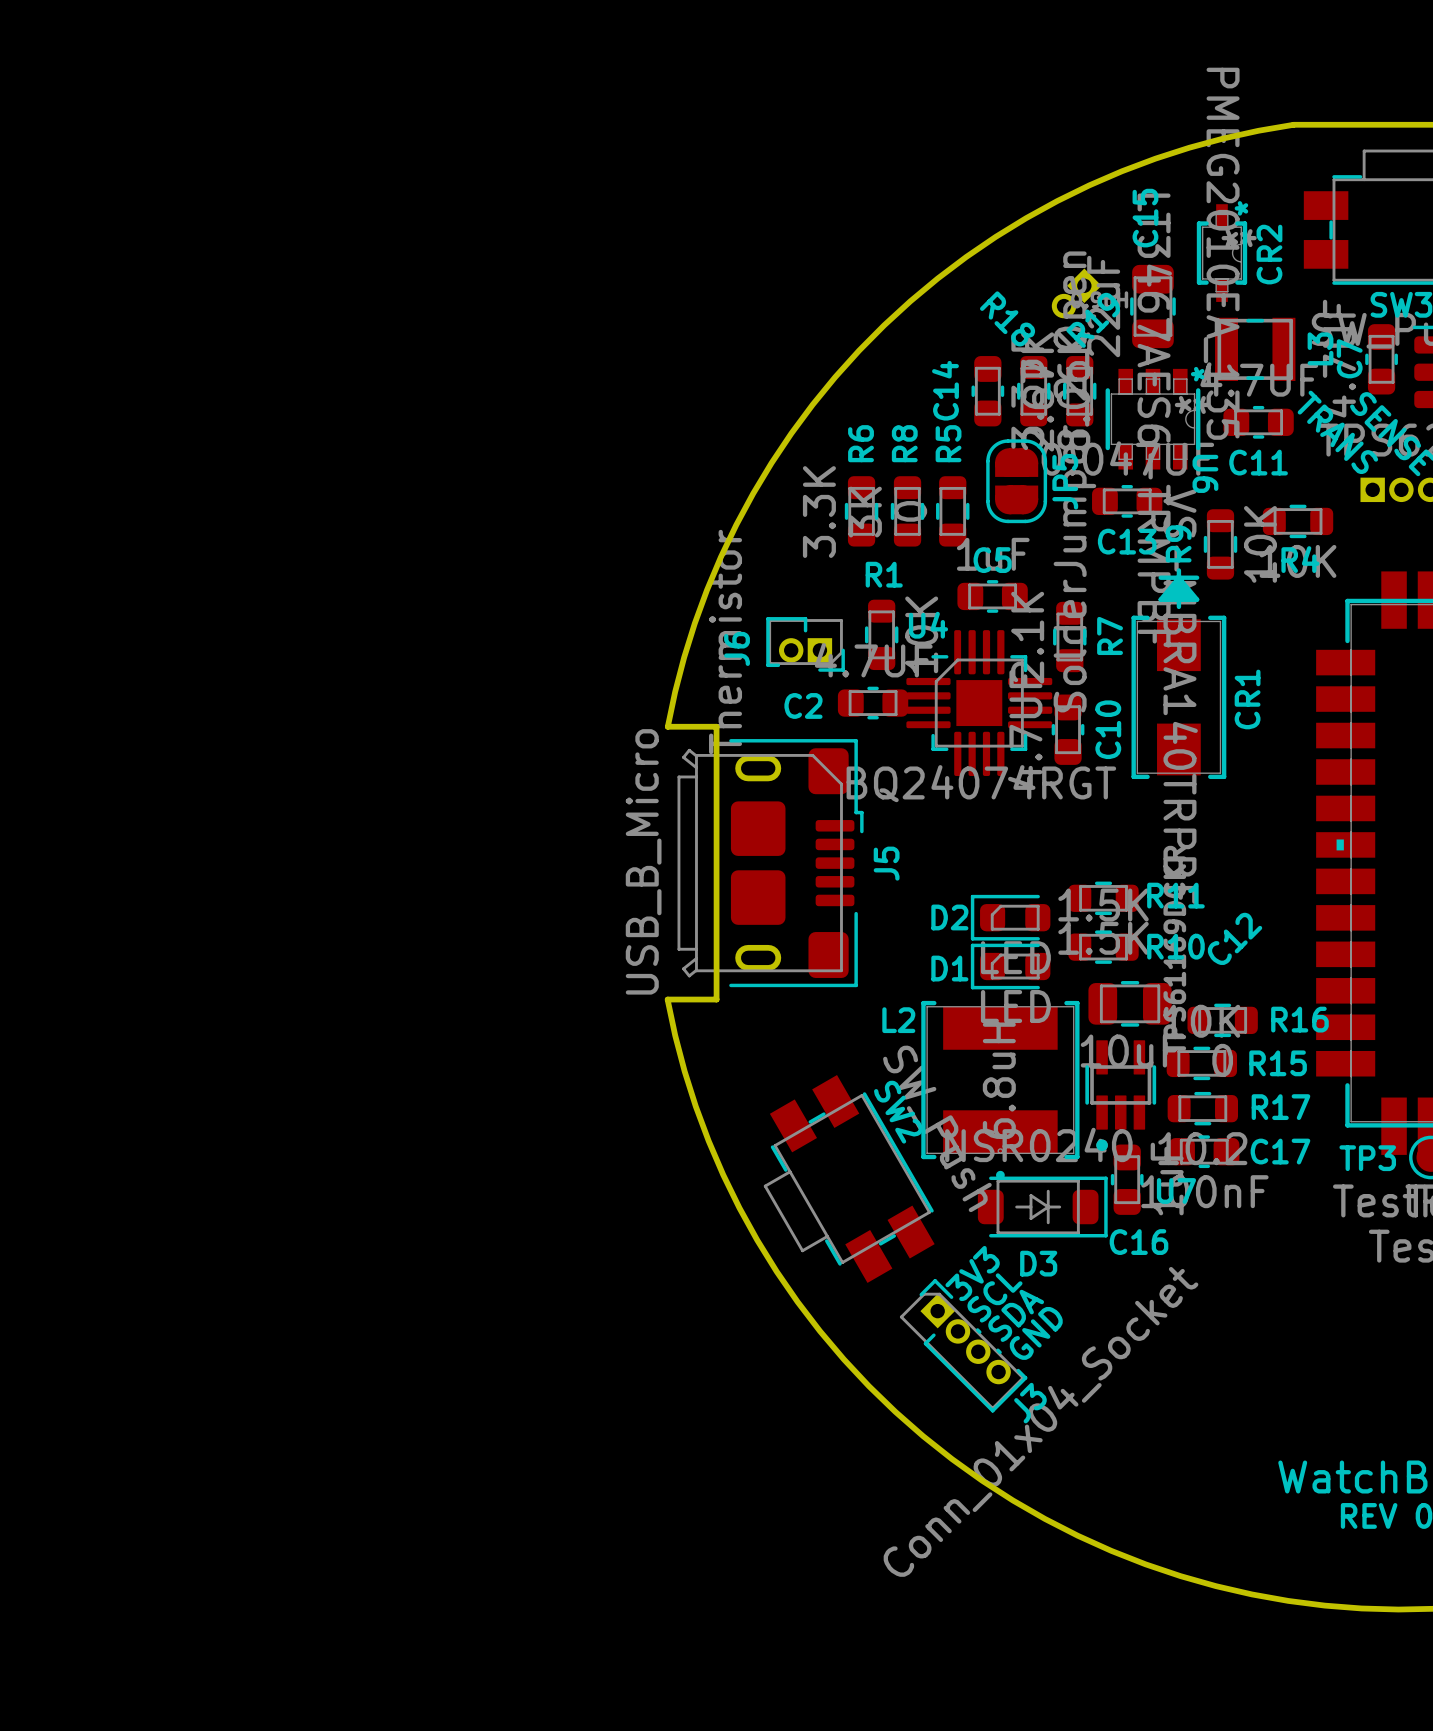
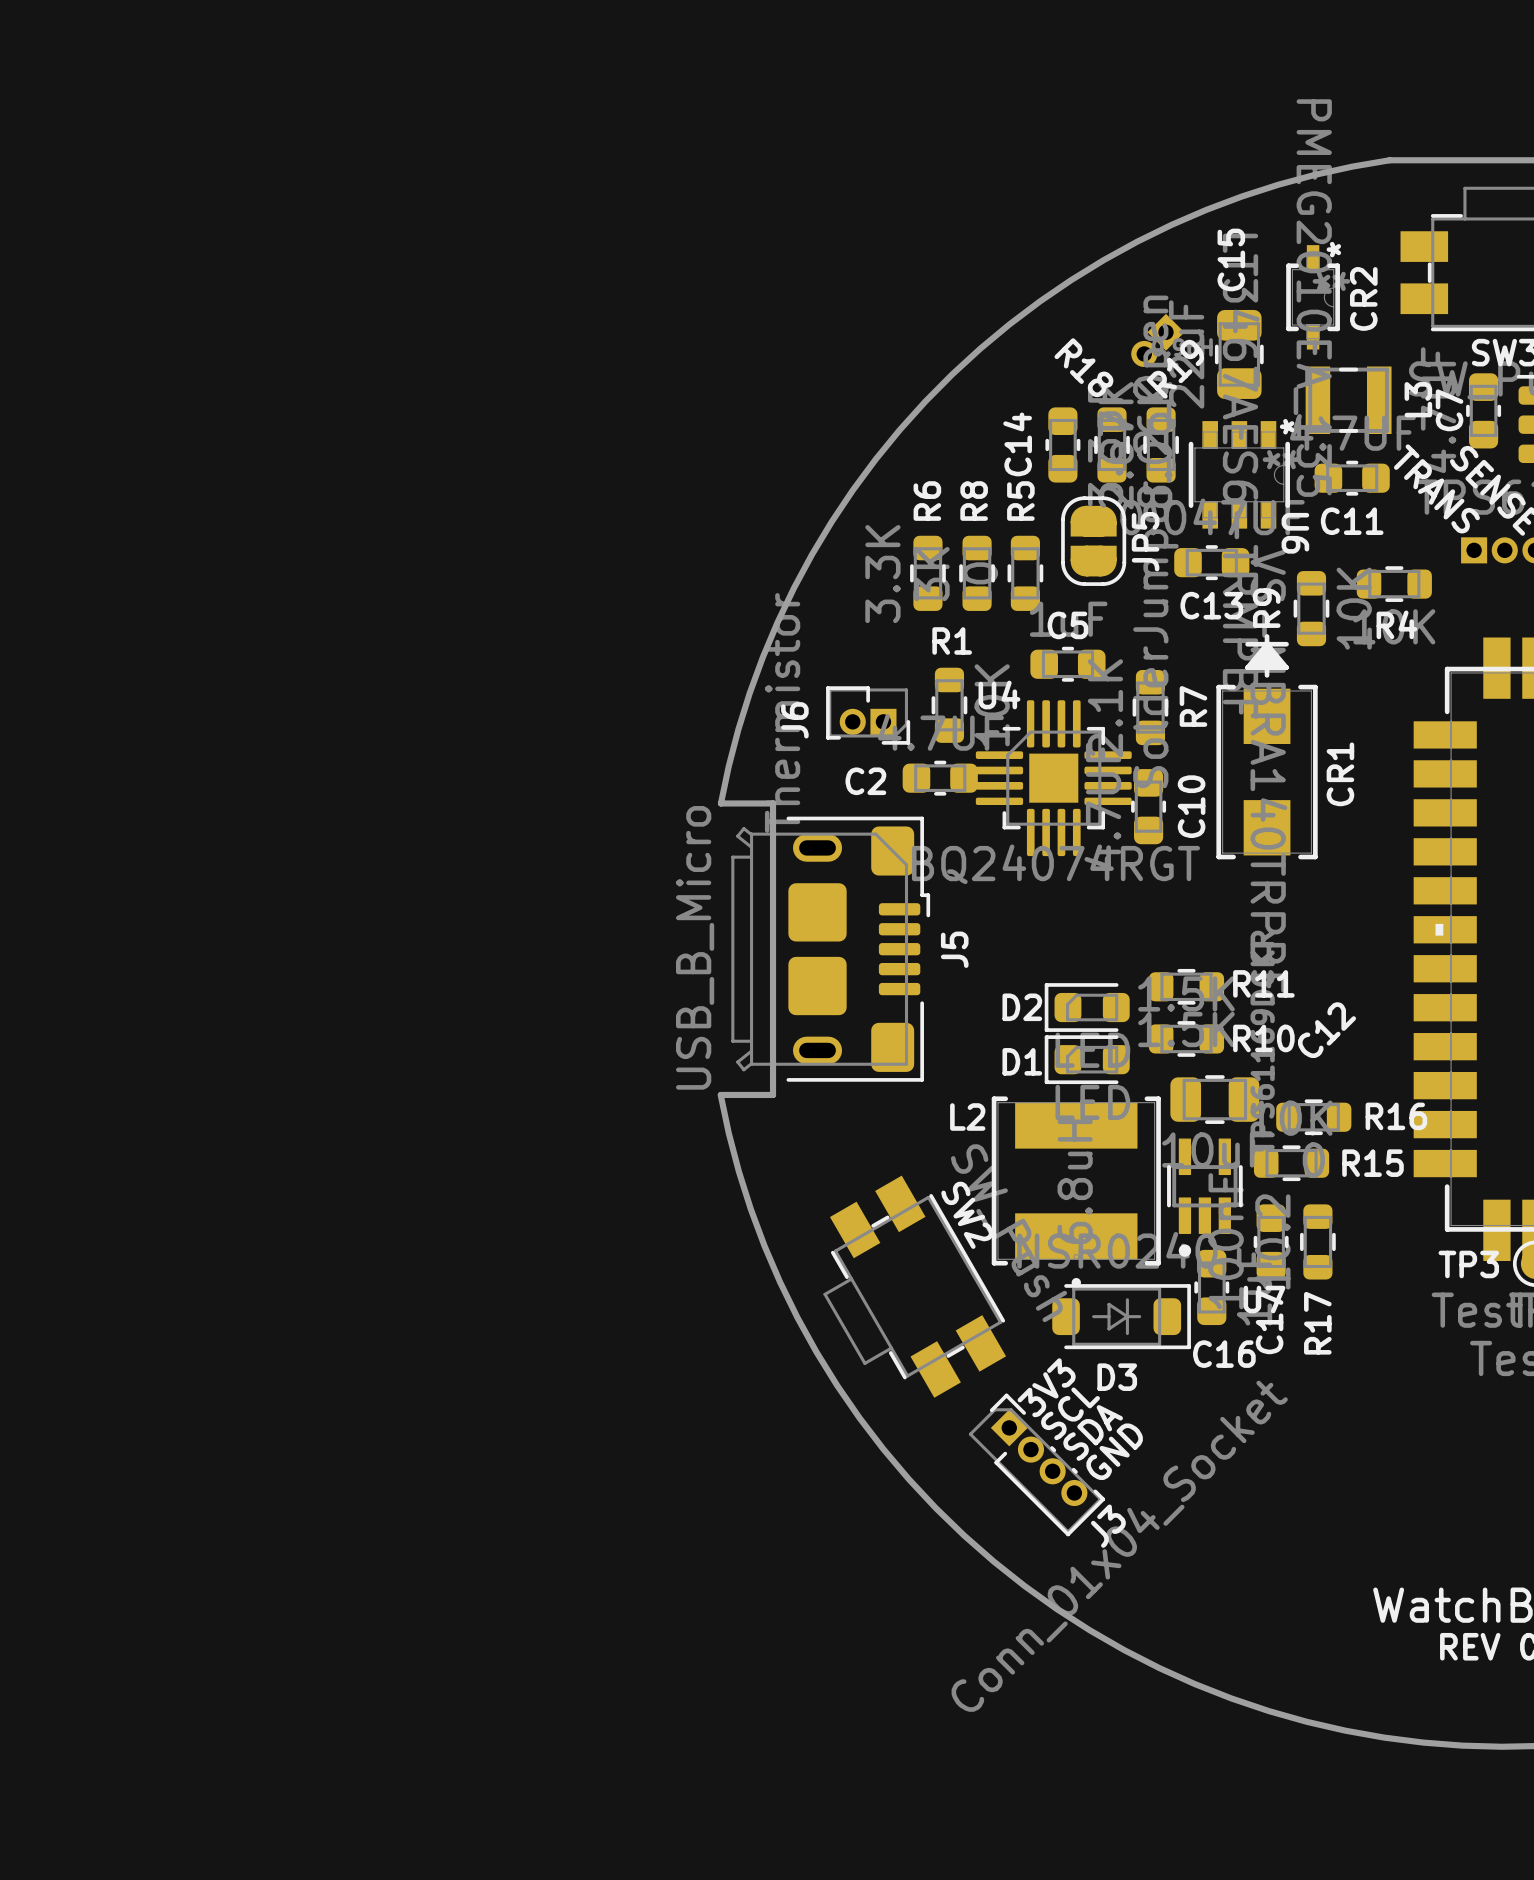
R17 rotation: 0° (1202, 1108) -> 90° clockwise (1317, 1241)
C17 rotation: 0° (1204, 1151) -> 90° clockwise (1271, 1241)

